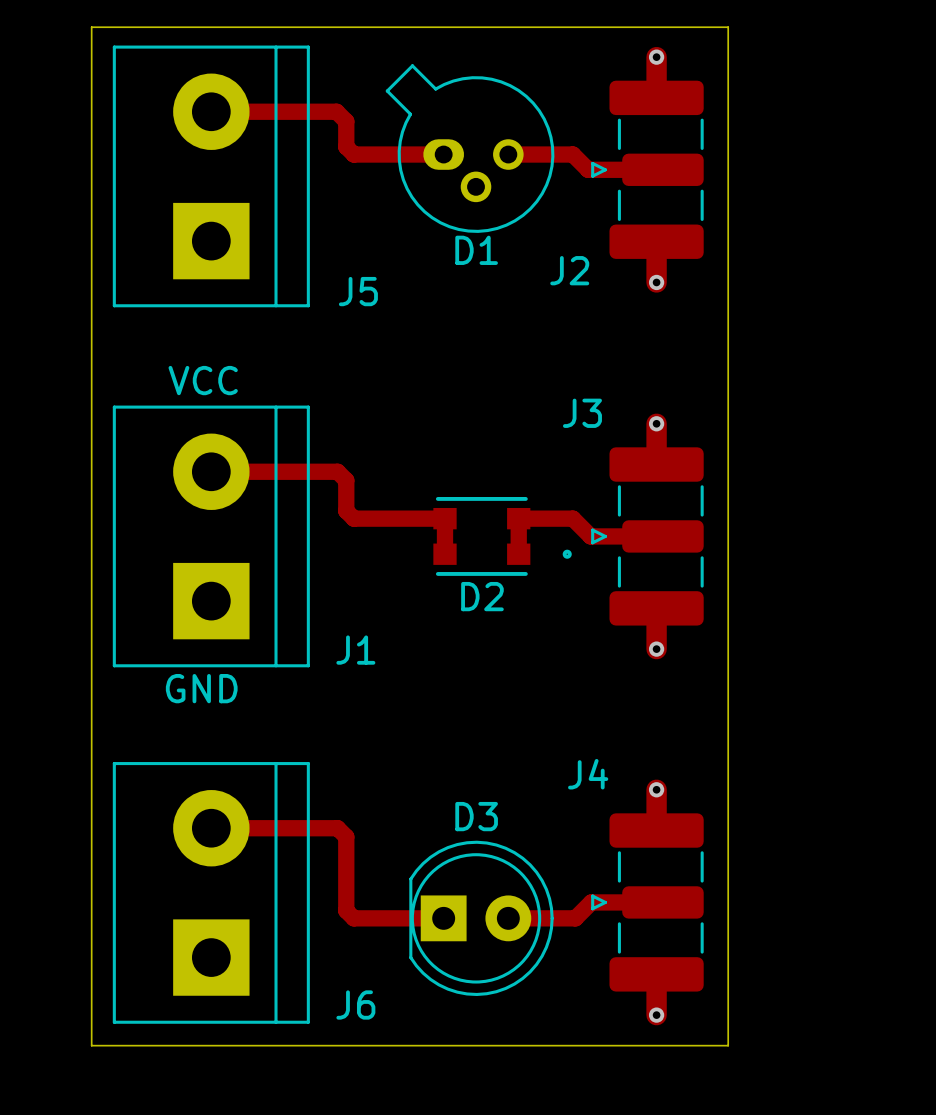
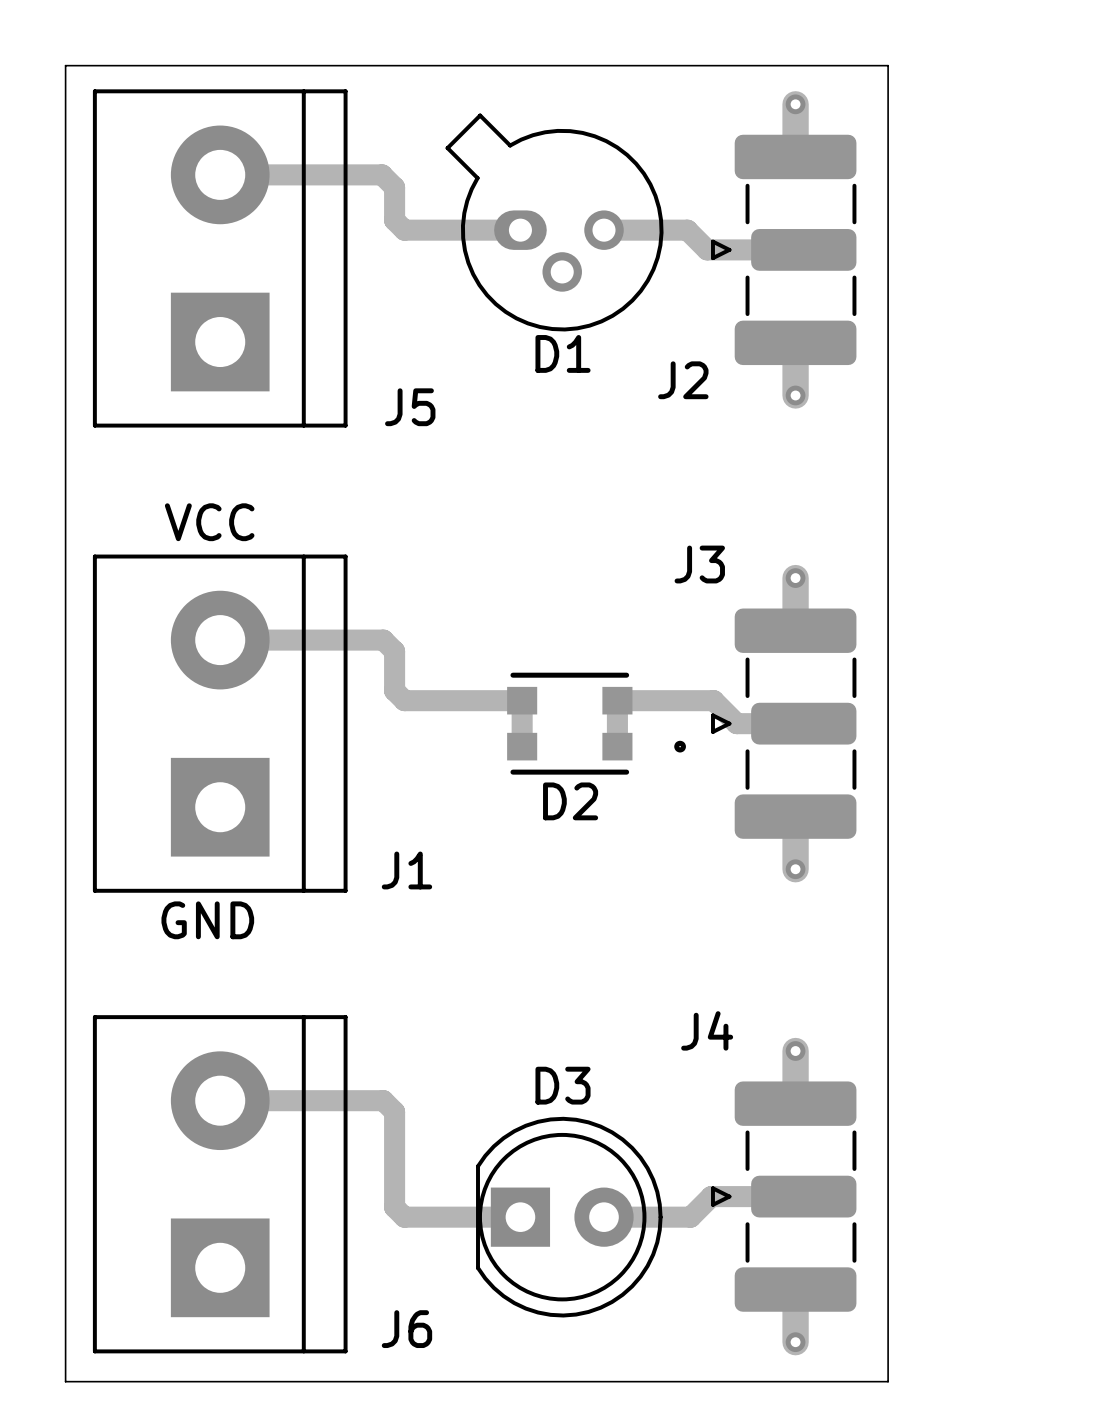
track: (572, 518) (590, 536) (611, 536) -> (687, 700) (713, 700) (736, 723)

